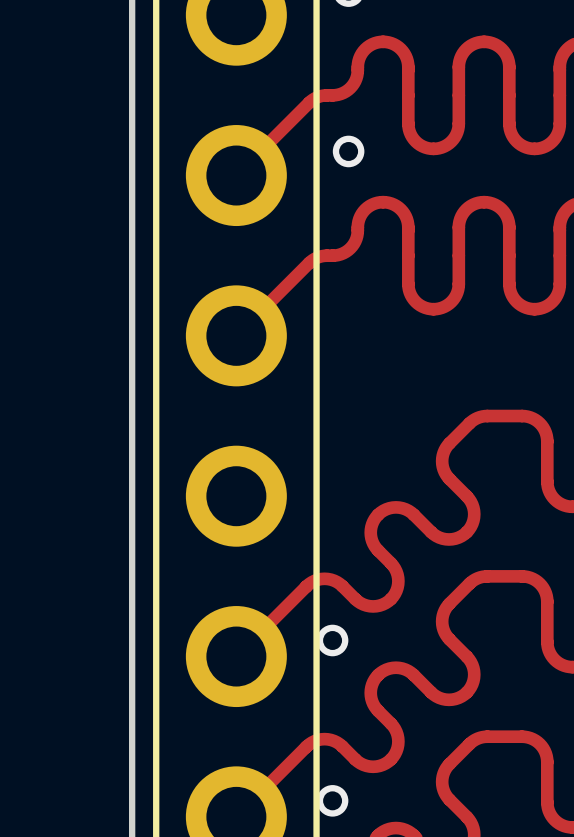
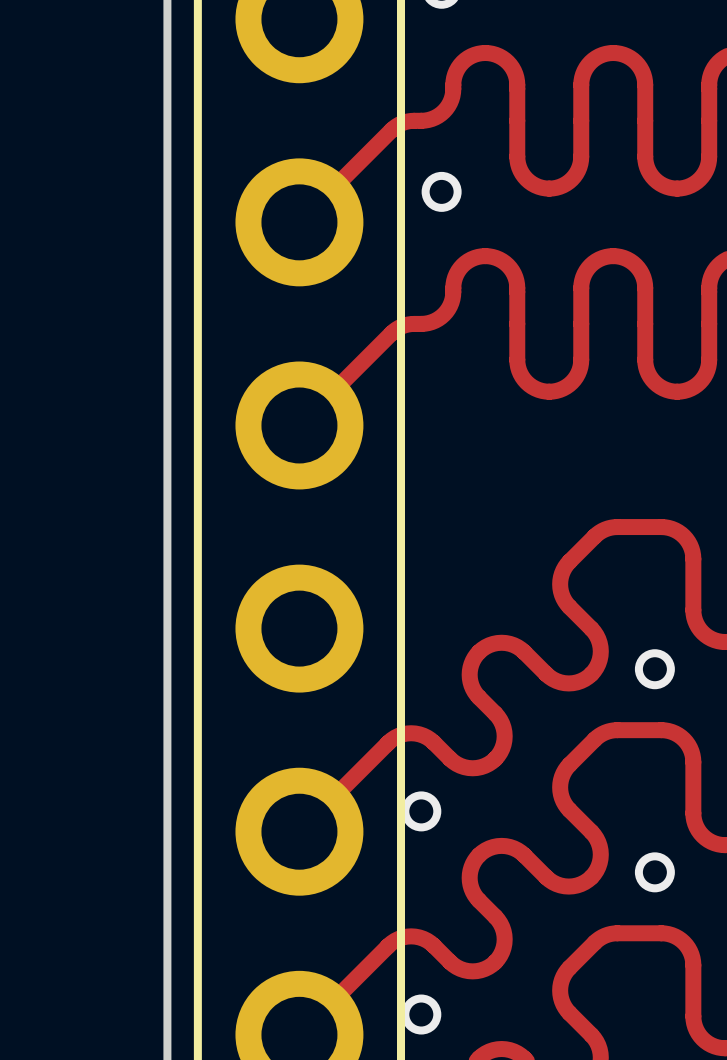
via: none -> (654, 669)
via: none -> (654, 872)

